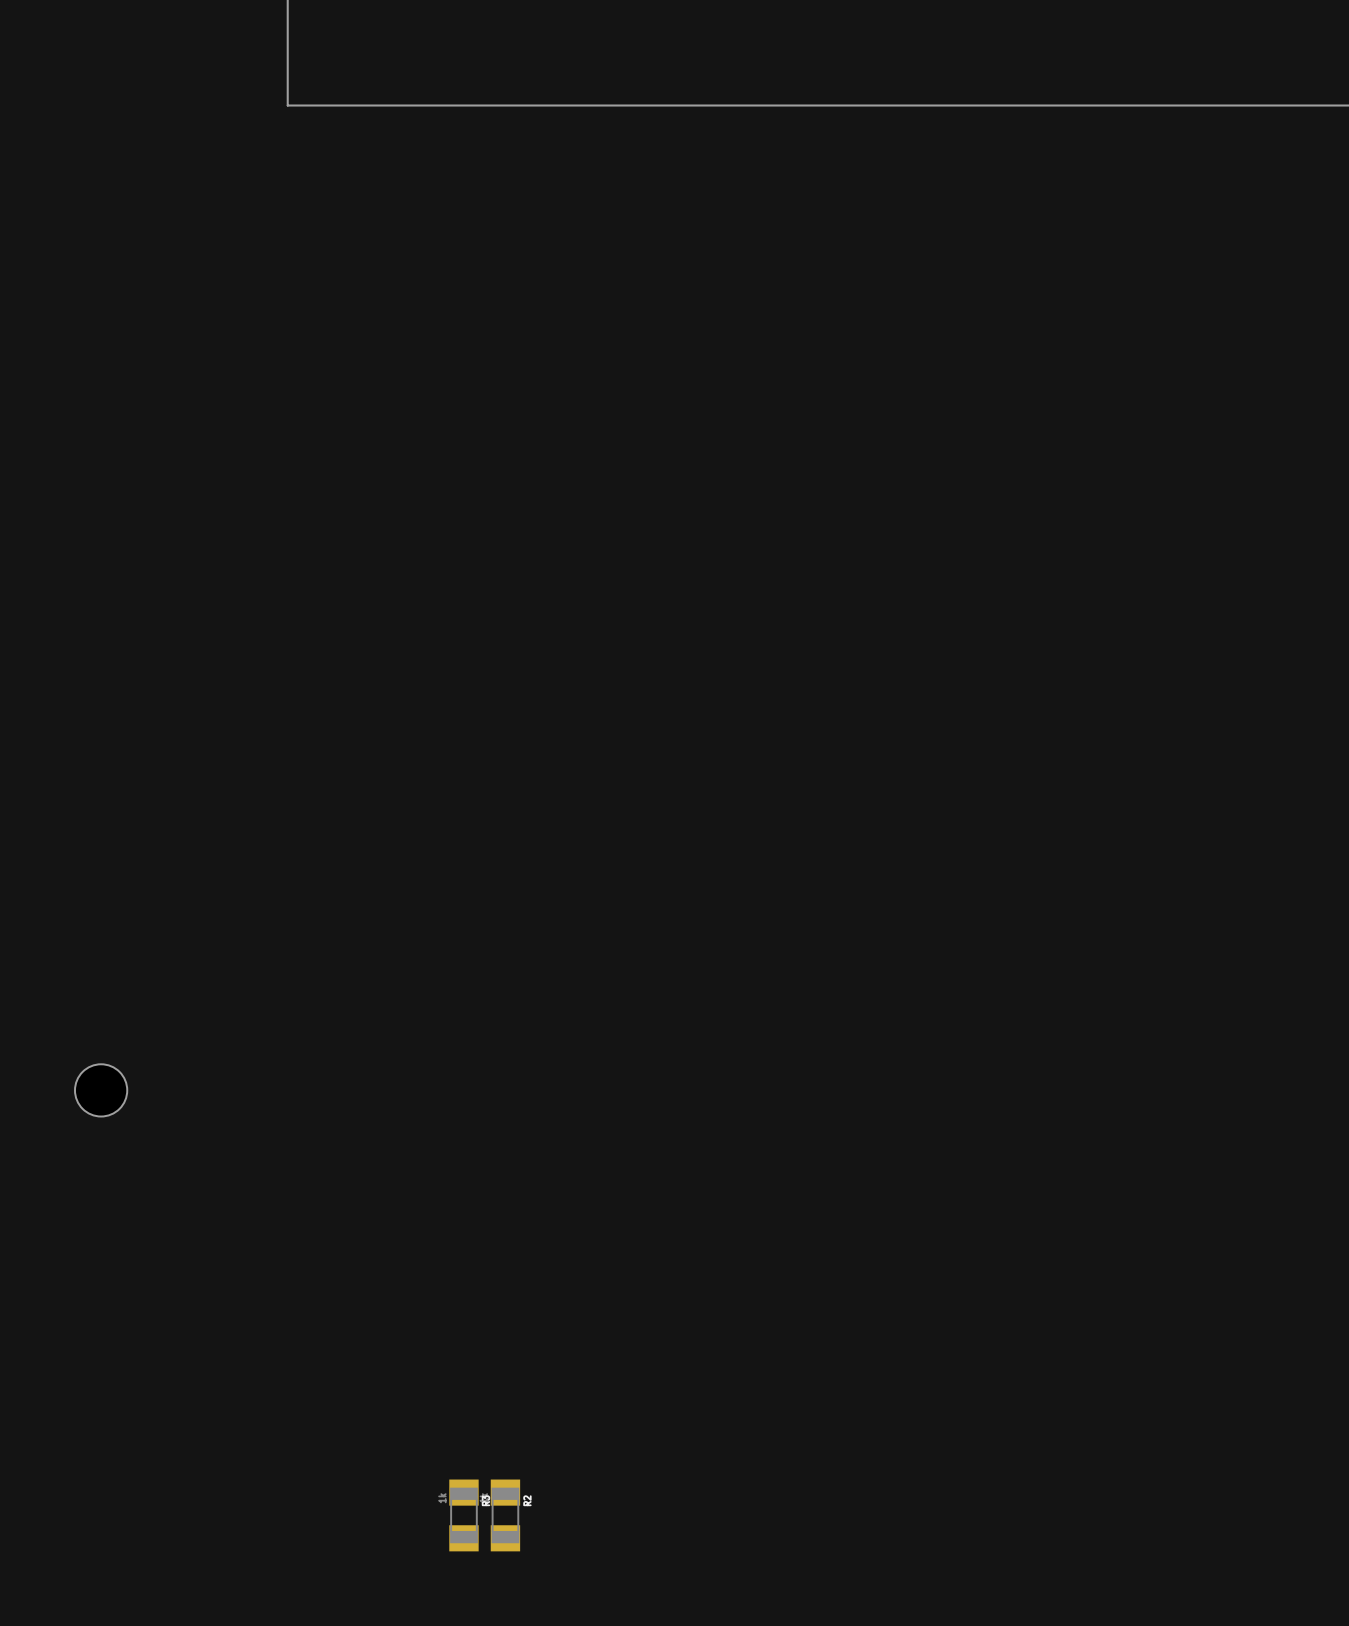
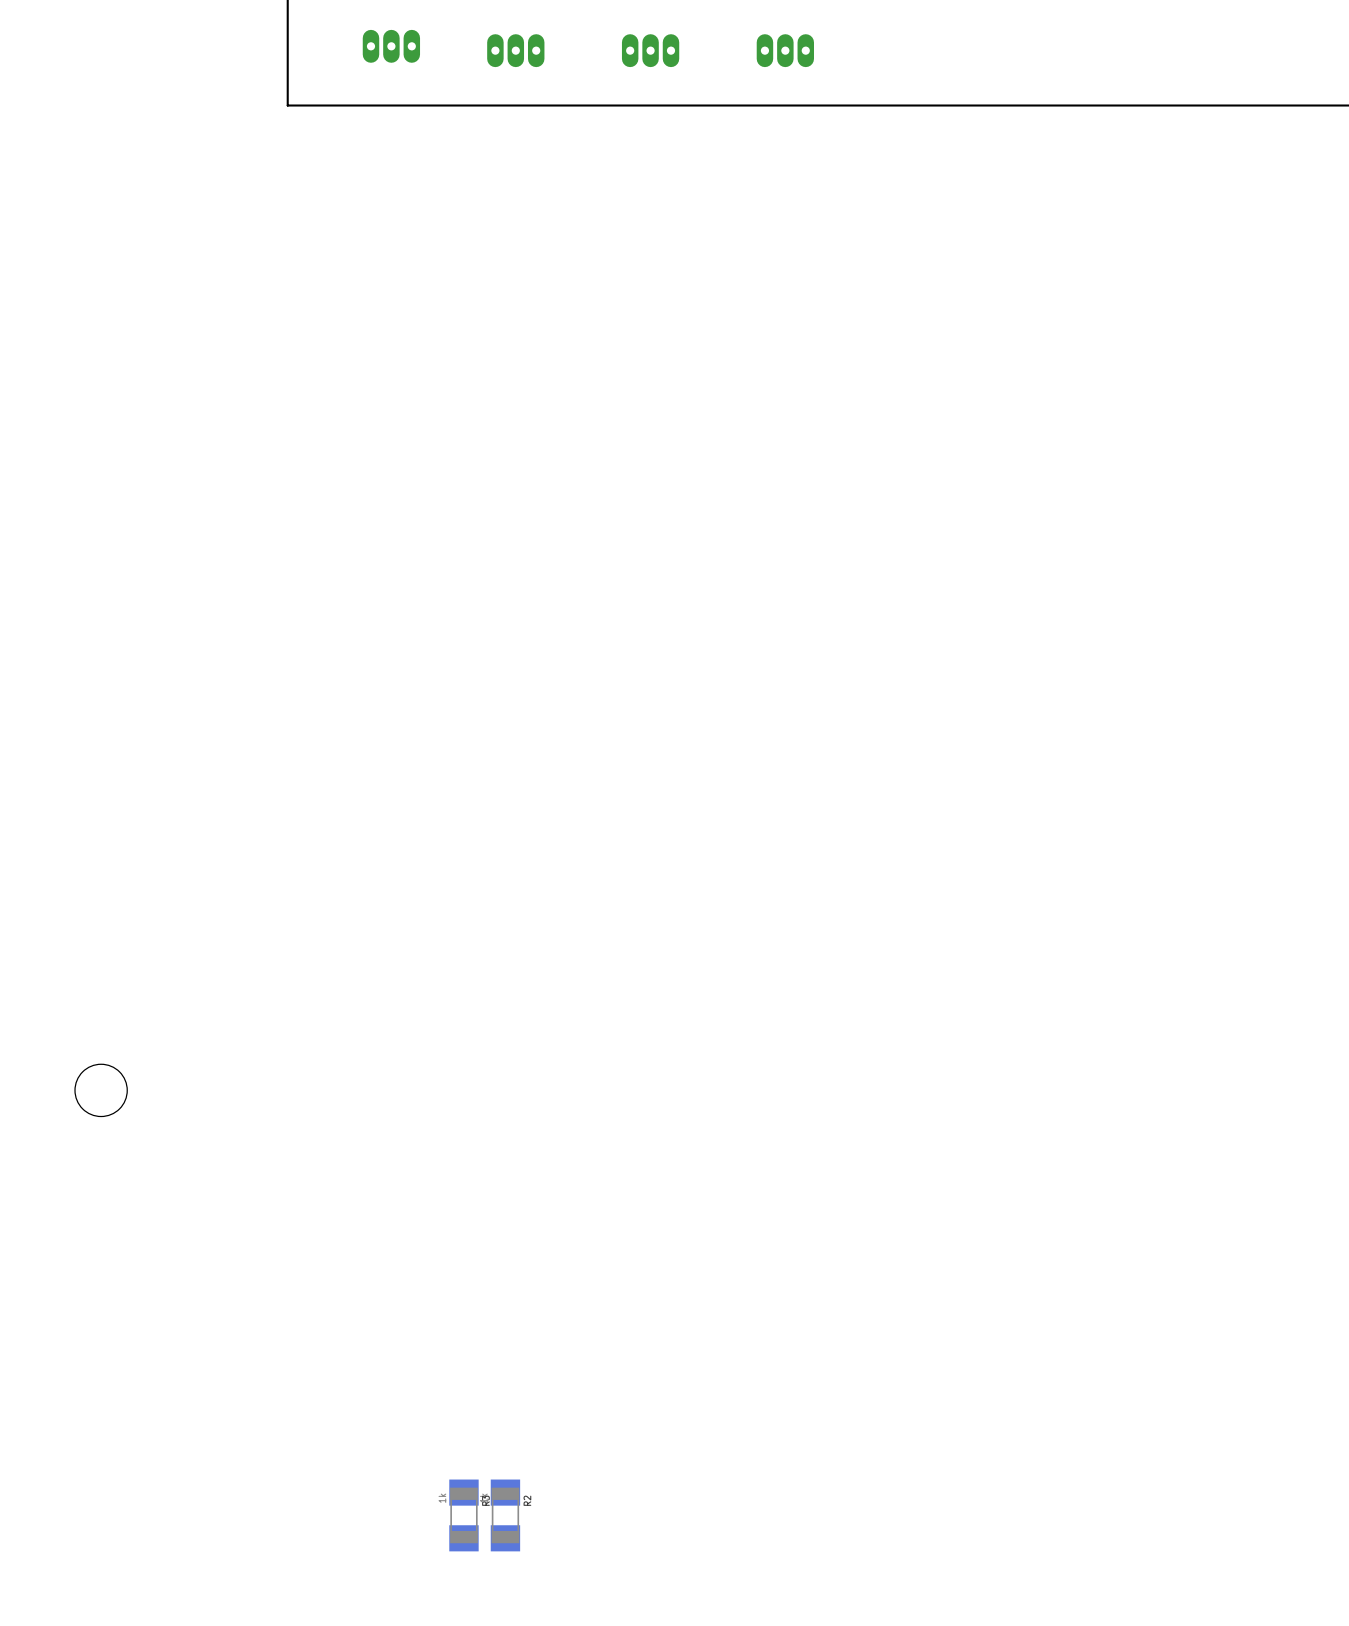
part: none -> (391, 46)
part: none -> (515, 50)
part: none -> (650, 50)
part: none -> (785, 50)

